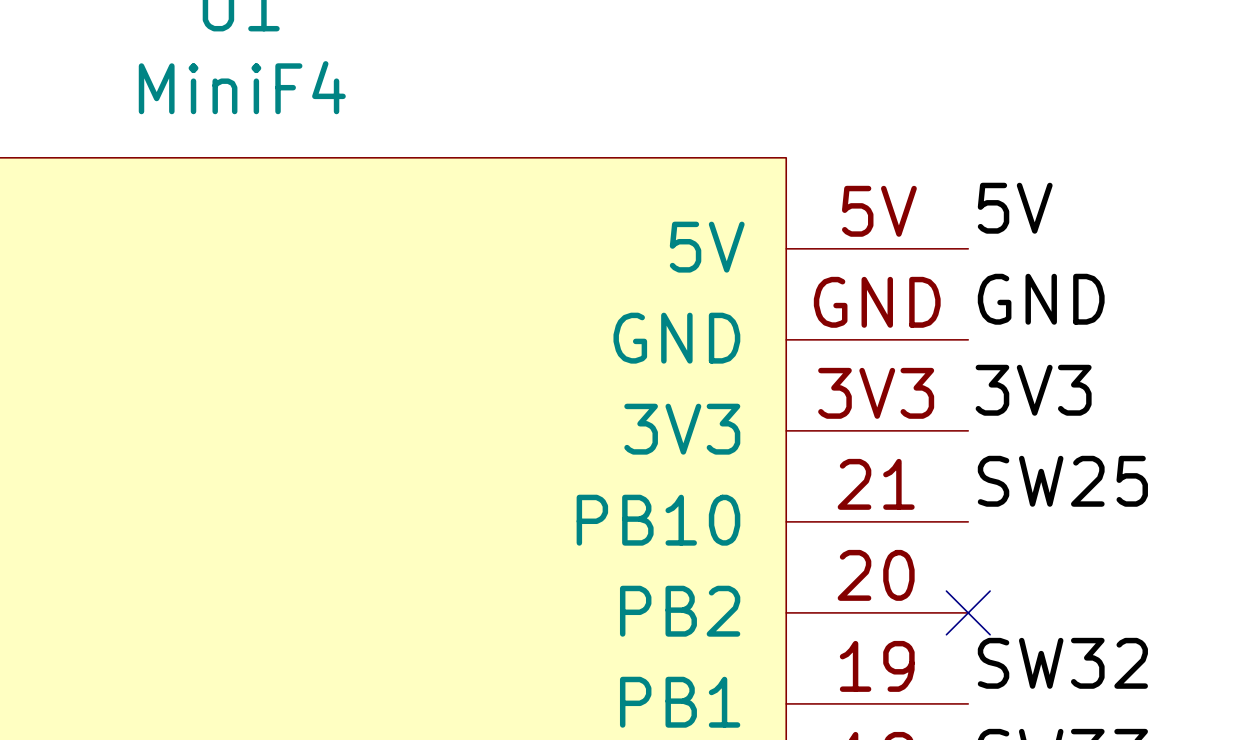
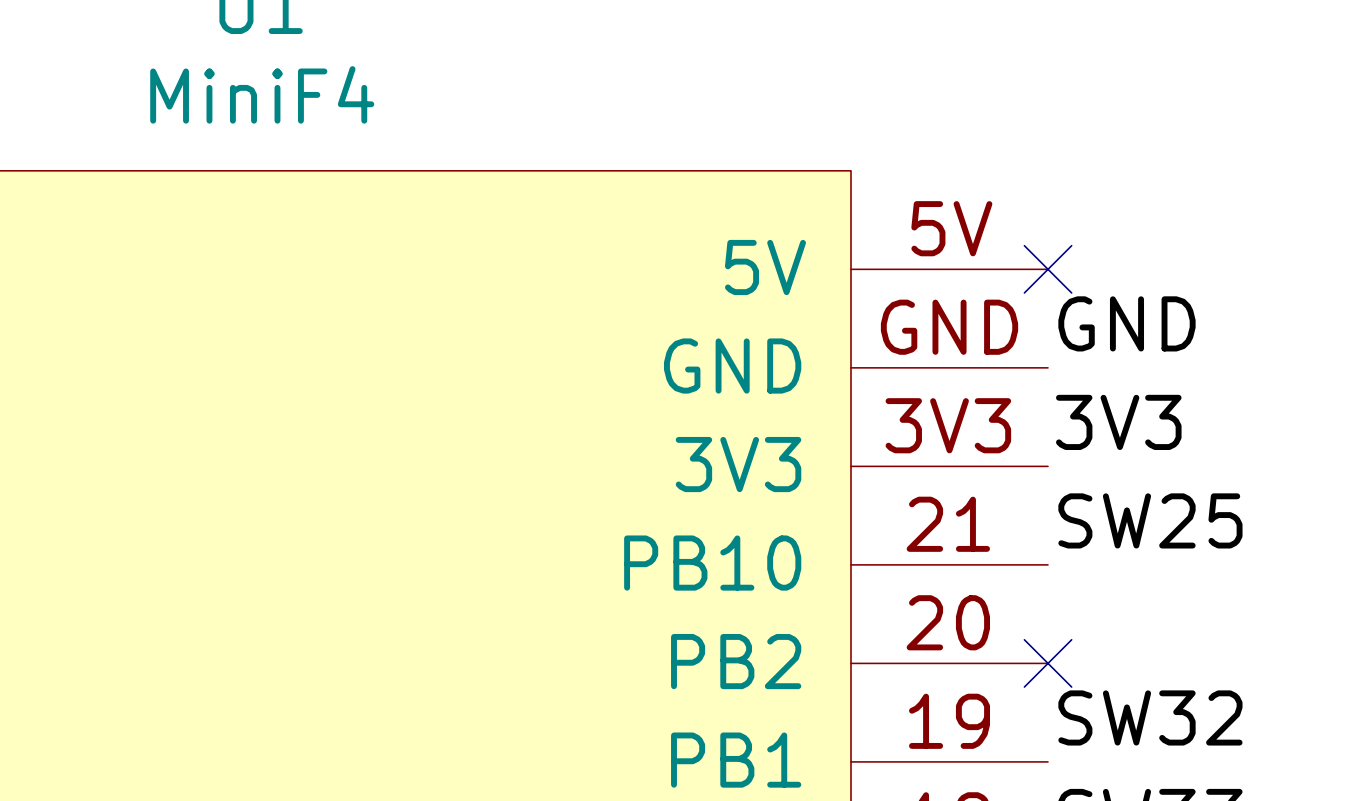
label: 5V (1015, 208) -> none
no-connect mark: none -> (1048, 269)

